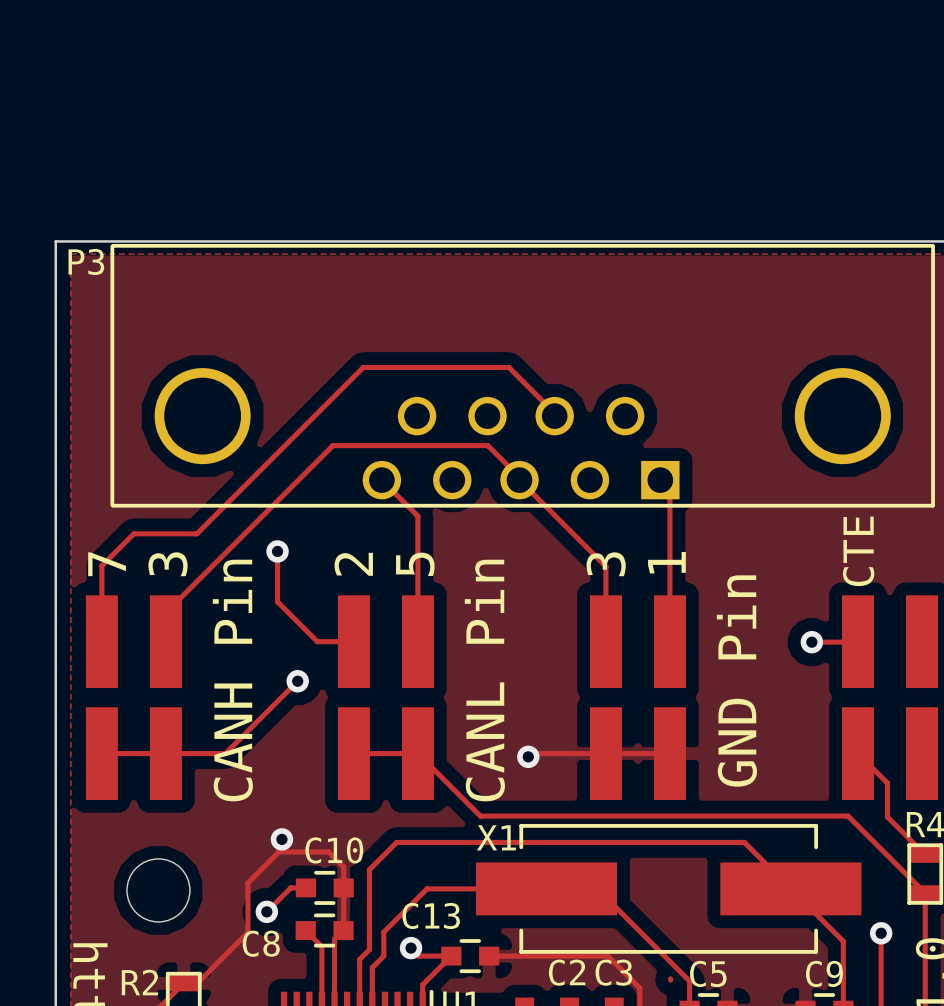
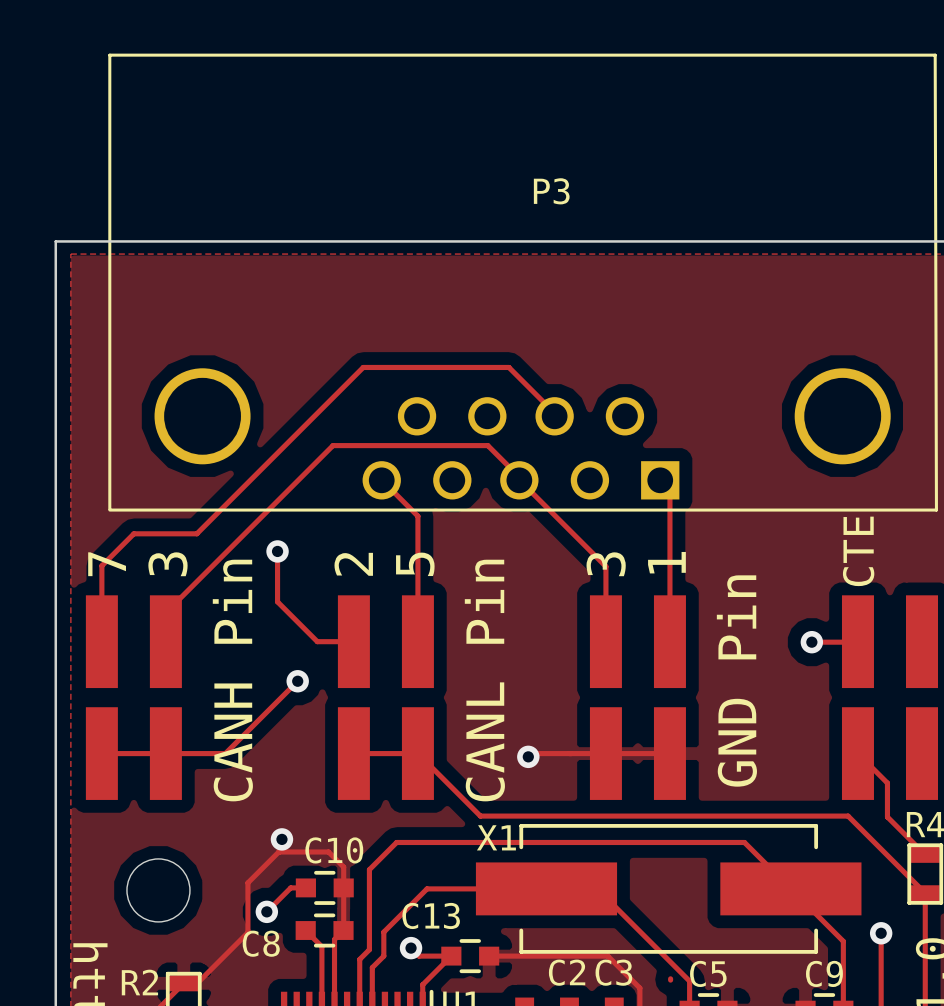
P3 footprint: [110, 243, 935, 508] -> [108, 53, 938, 512]
P3 name position: P3 (86, 261) -> P3 (551, 191)

